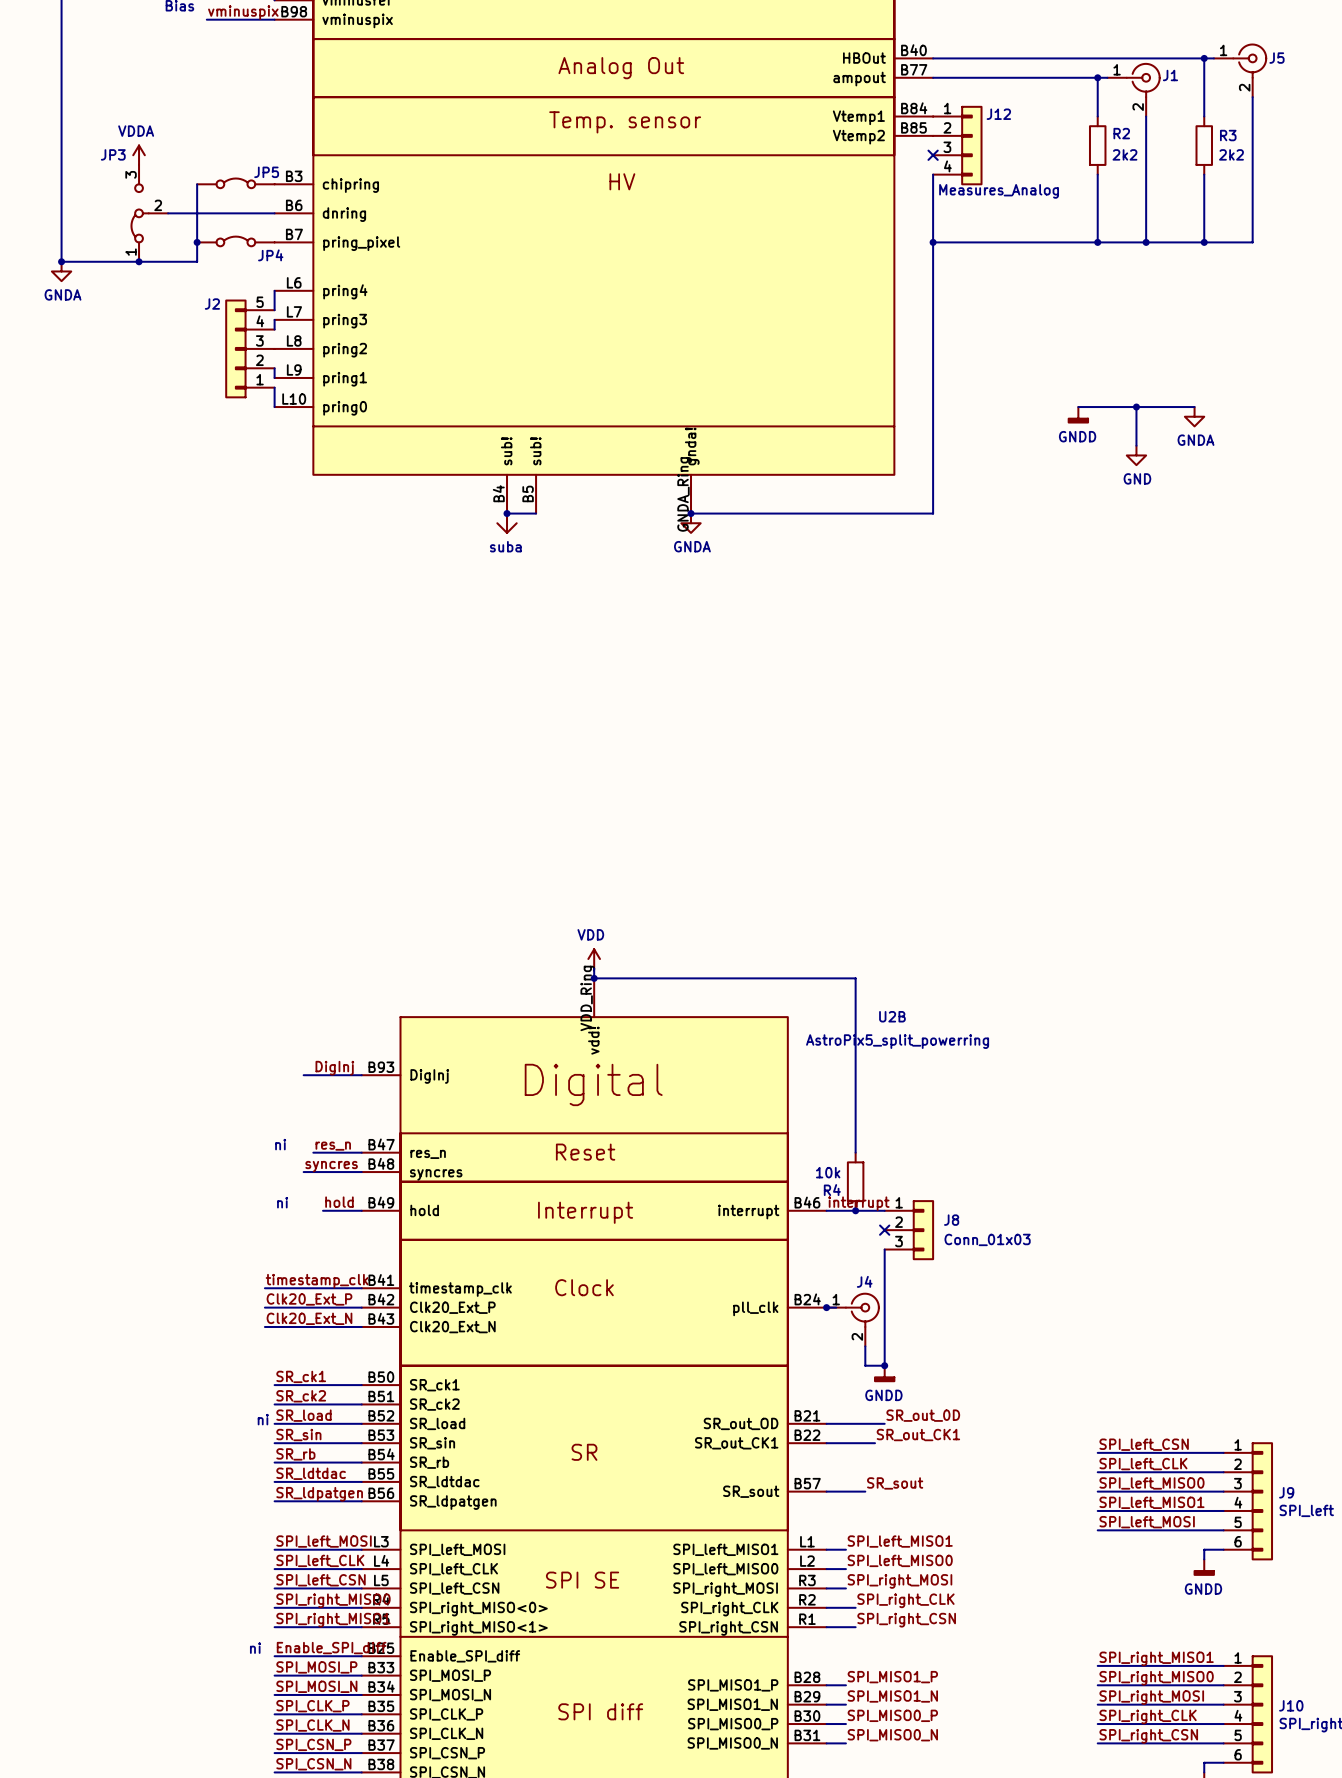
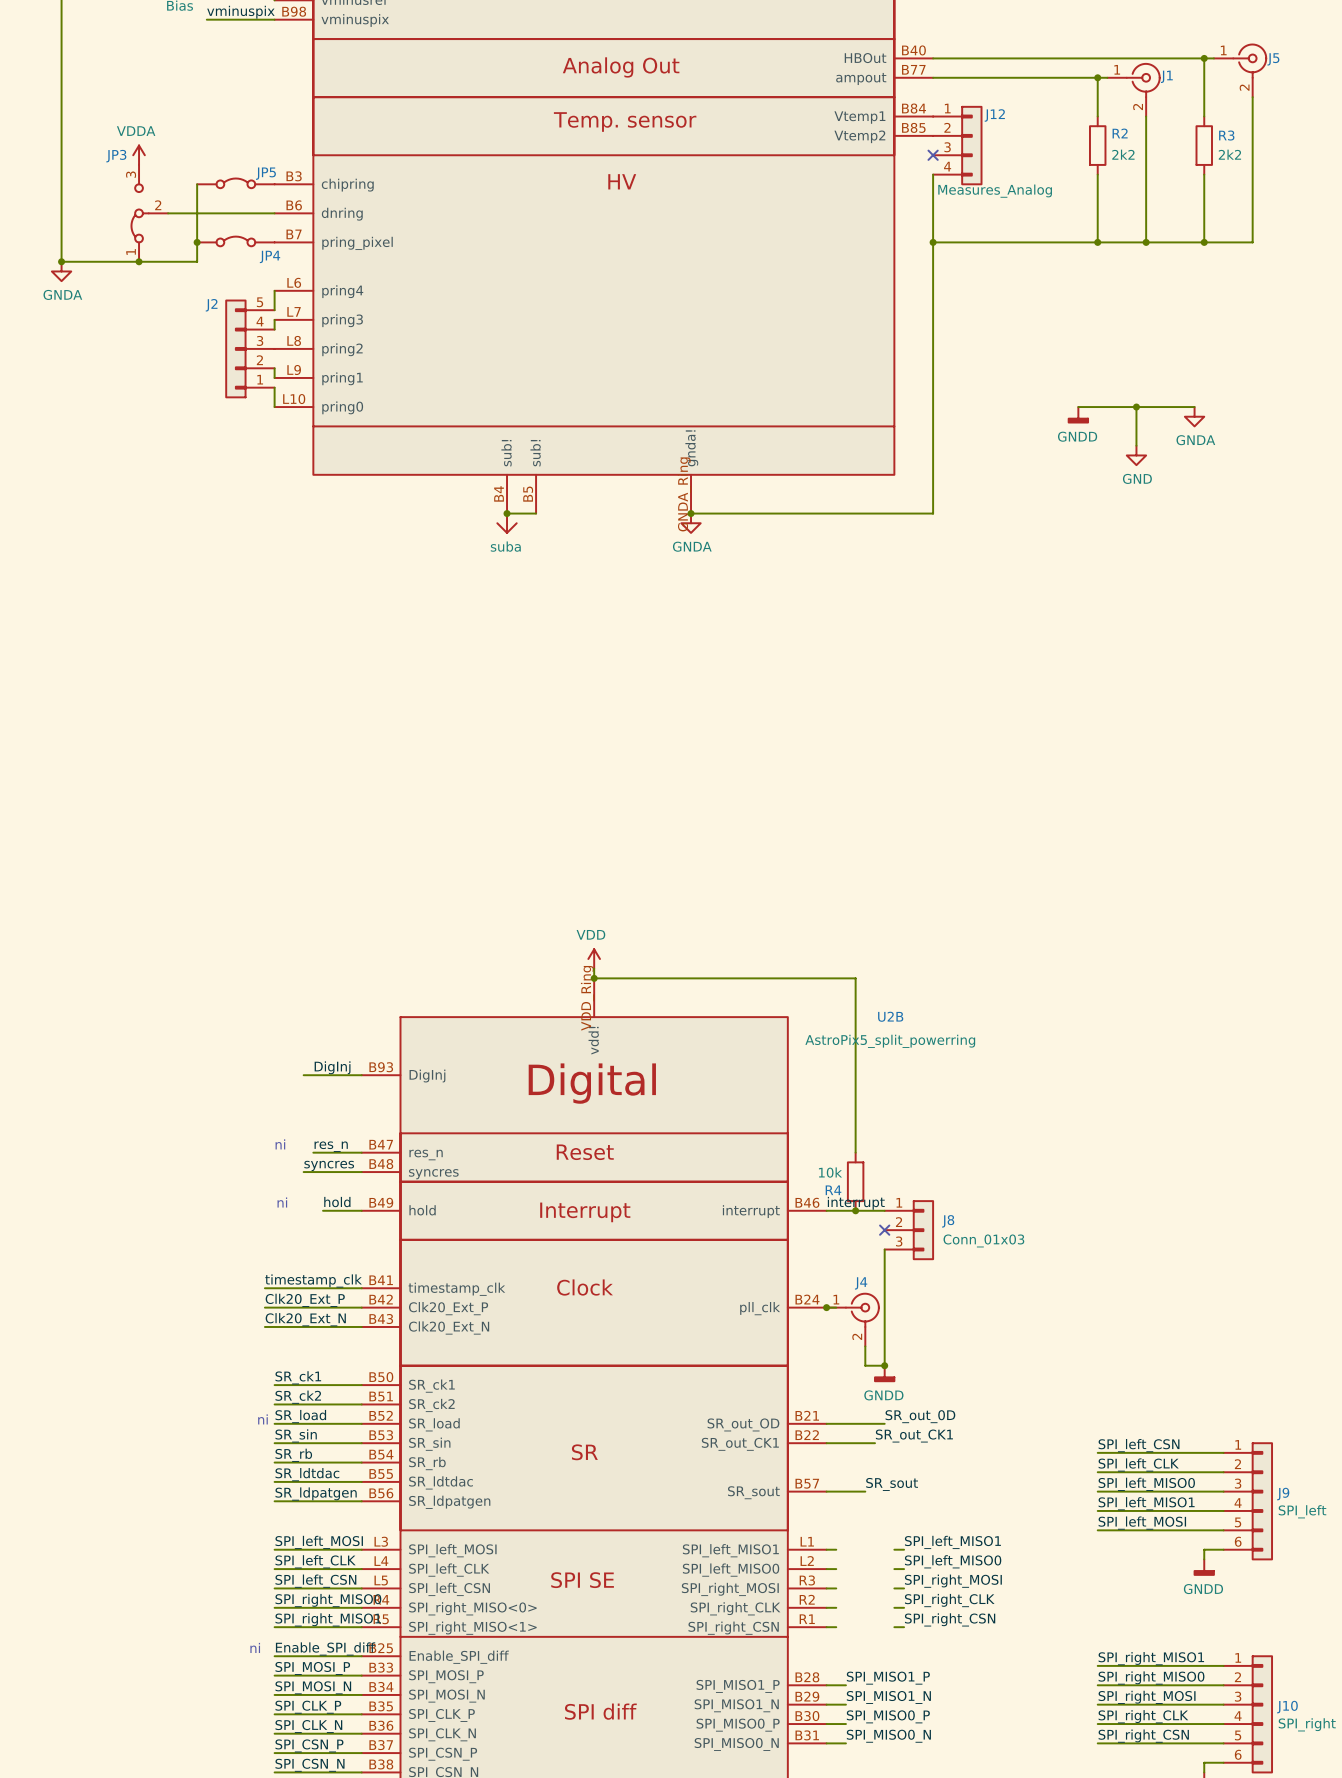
label position: SPI_left_MISO1 (900, 1541) -> SPI_left_MISO1 (952, 1542)
wire: (836, 1549) (845, 1549) -> (894, 1549) (904, 1549)
label position: SPI_left_MISO0 (900, 1560) -> SPI_left_MISO0 (953, 1561)
wire: (836, 1569) (845, 1569) -> (894, 1569) (904, 1569)
label position: SPI_right_MOSI (899, 1581) -> SPI_right_MOSI (953, 1581)
wire: (836, 1588) (845, 1588) -> (894, 1588) (904, 1588)
label position: SPI_right_CLK (905, 1600) -> SPI_right_CLK (949, 1600)
wire: (836, 1607) (855, 1607) -> none
wire: none -> (894, 1607) (904, 1607)
label position: SPI_right_CSN (906, 1620) -> SPI_right_CSN (950, 1619)
wire: (836, 1627) (855, 1627) -> none
wire: none -> (894, 1627) (904, 1627)

